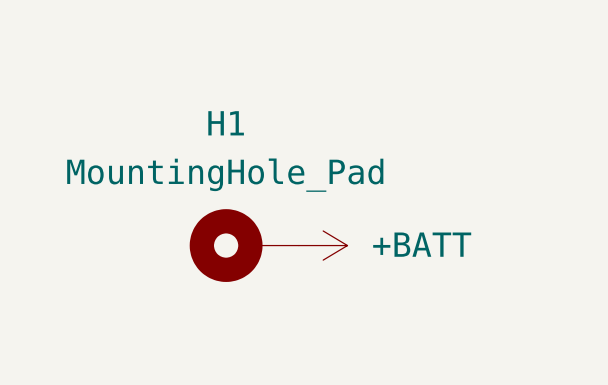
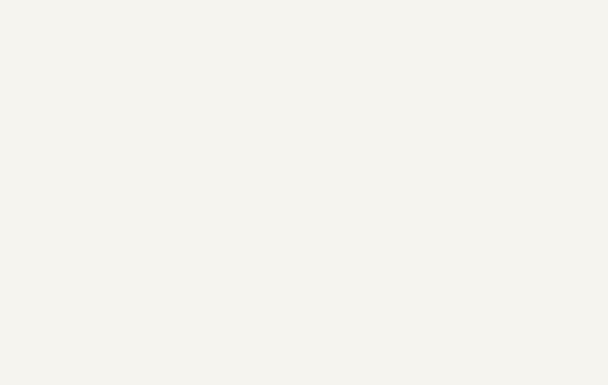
H1: MountingHole_Pad (244, 245) -> none
power symbol: +BATT (323, 245) -> none

